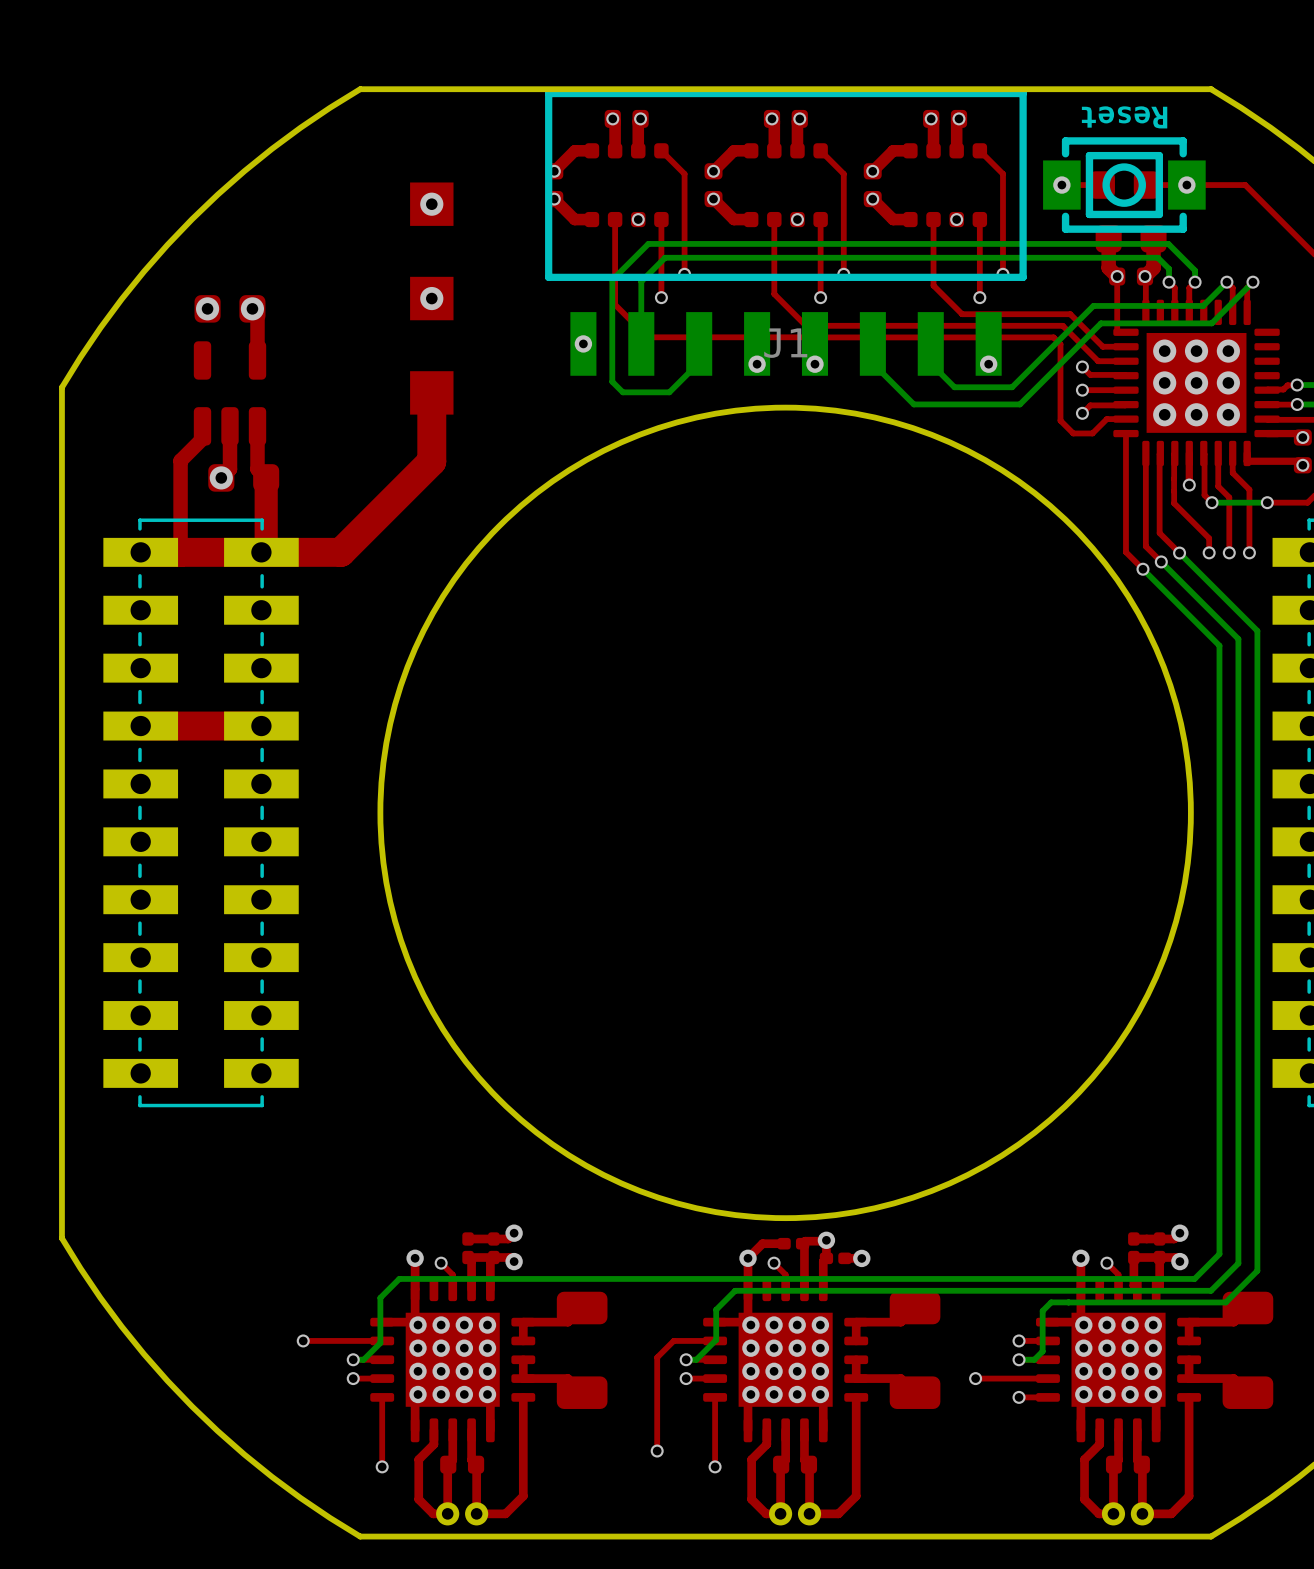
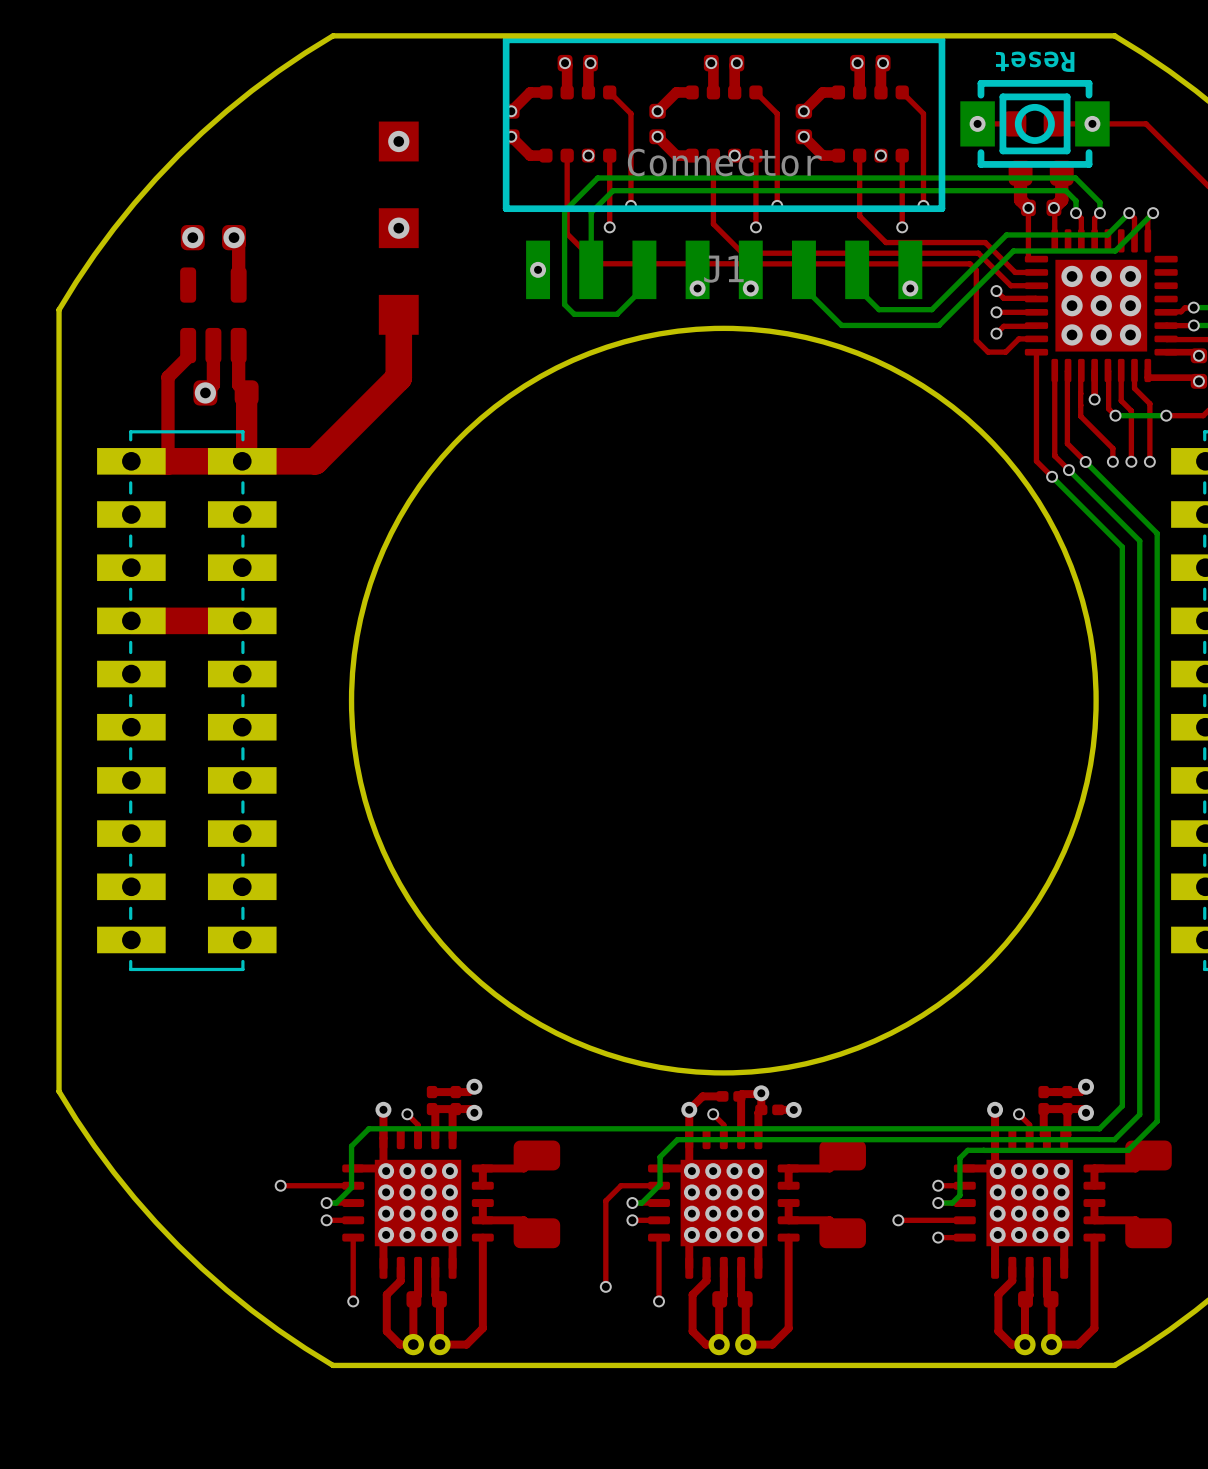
J1 value: none -> Connector (724, 162)

